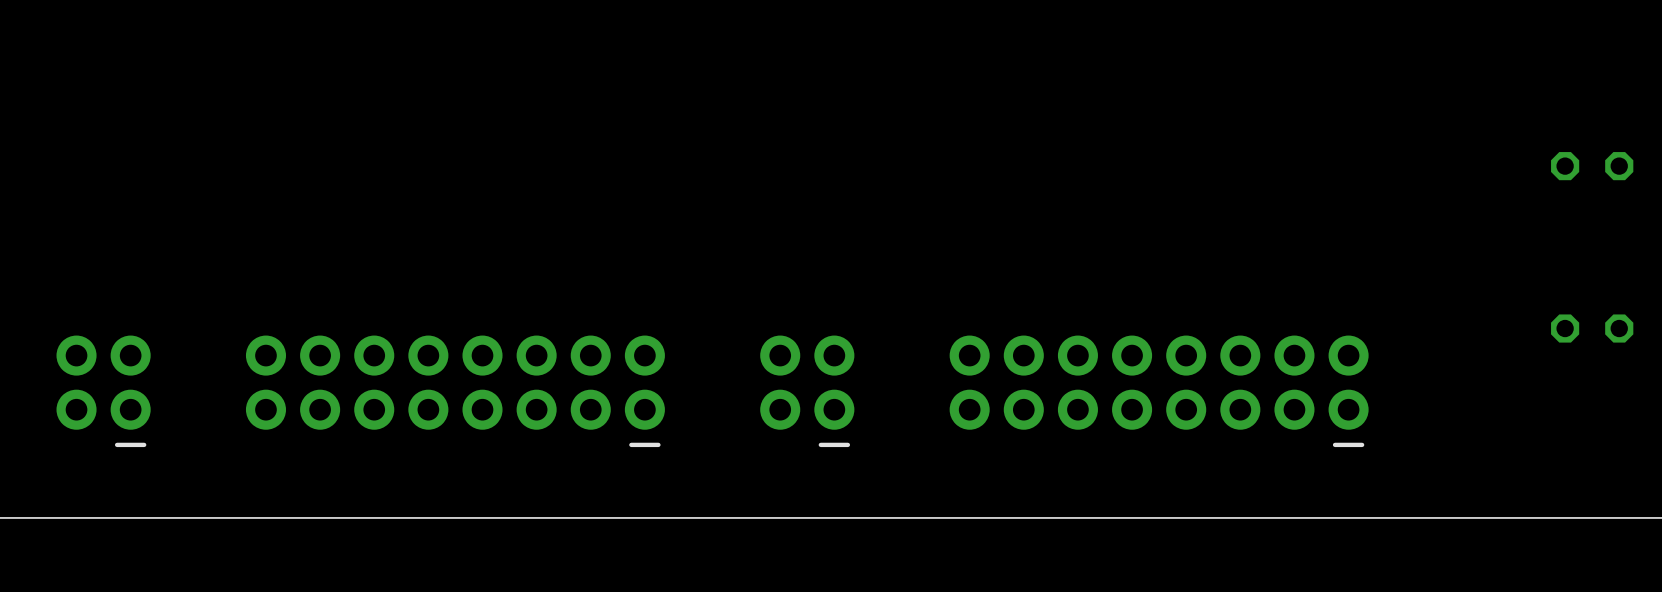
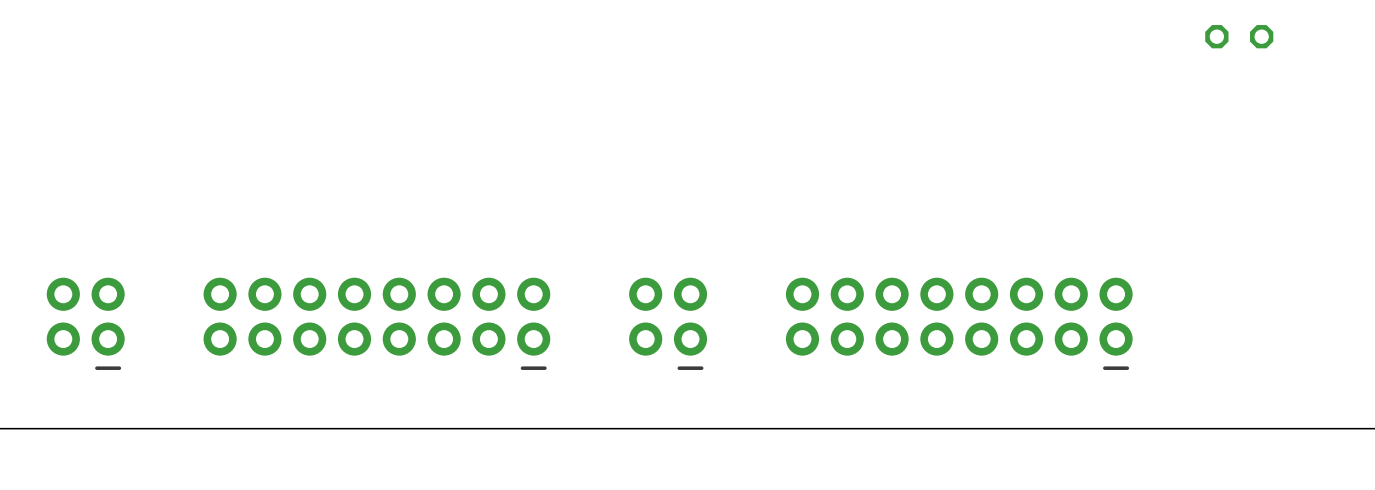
part: none -> (1239, 36)
part: (1592, 166) -> none
part: (1592, 328) -> none

